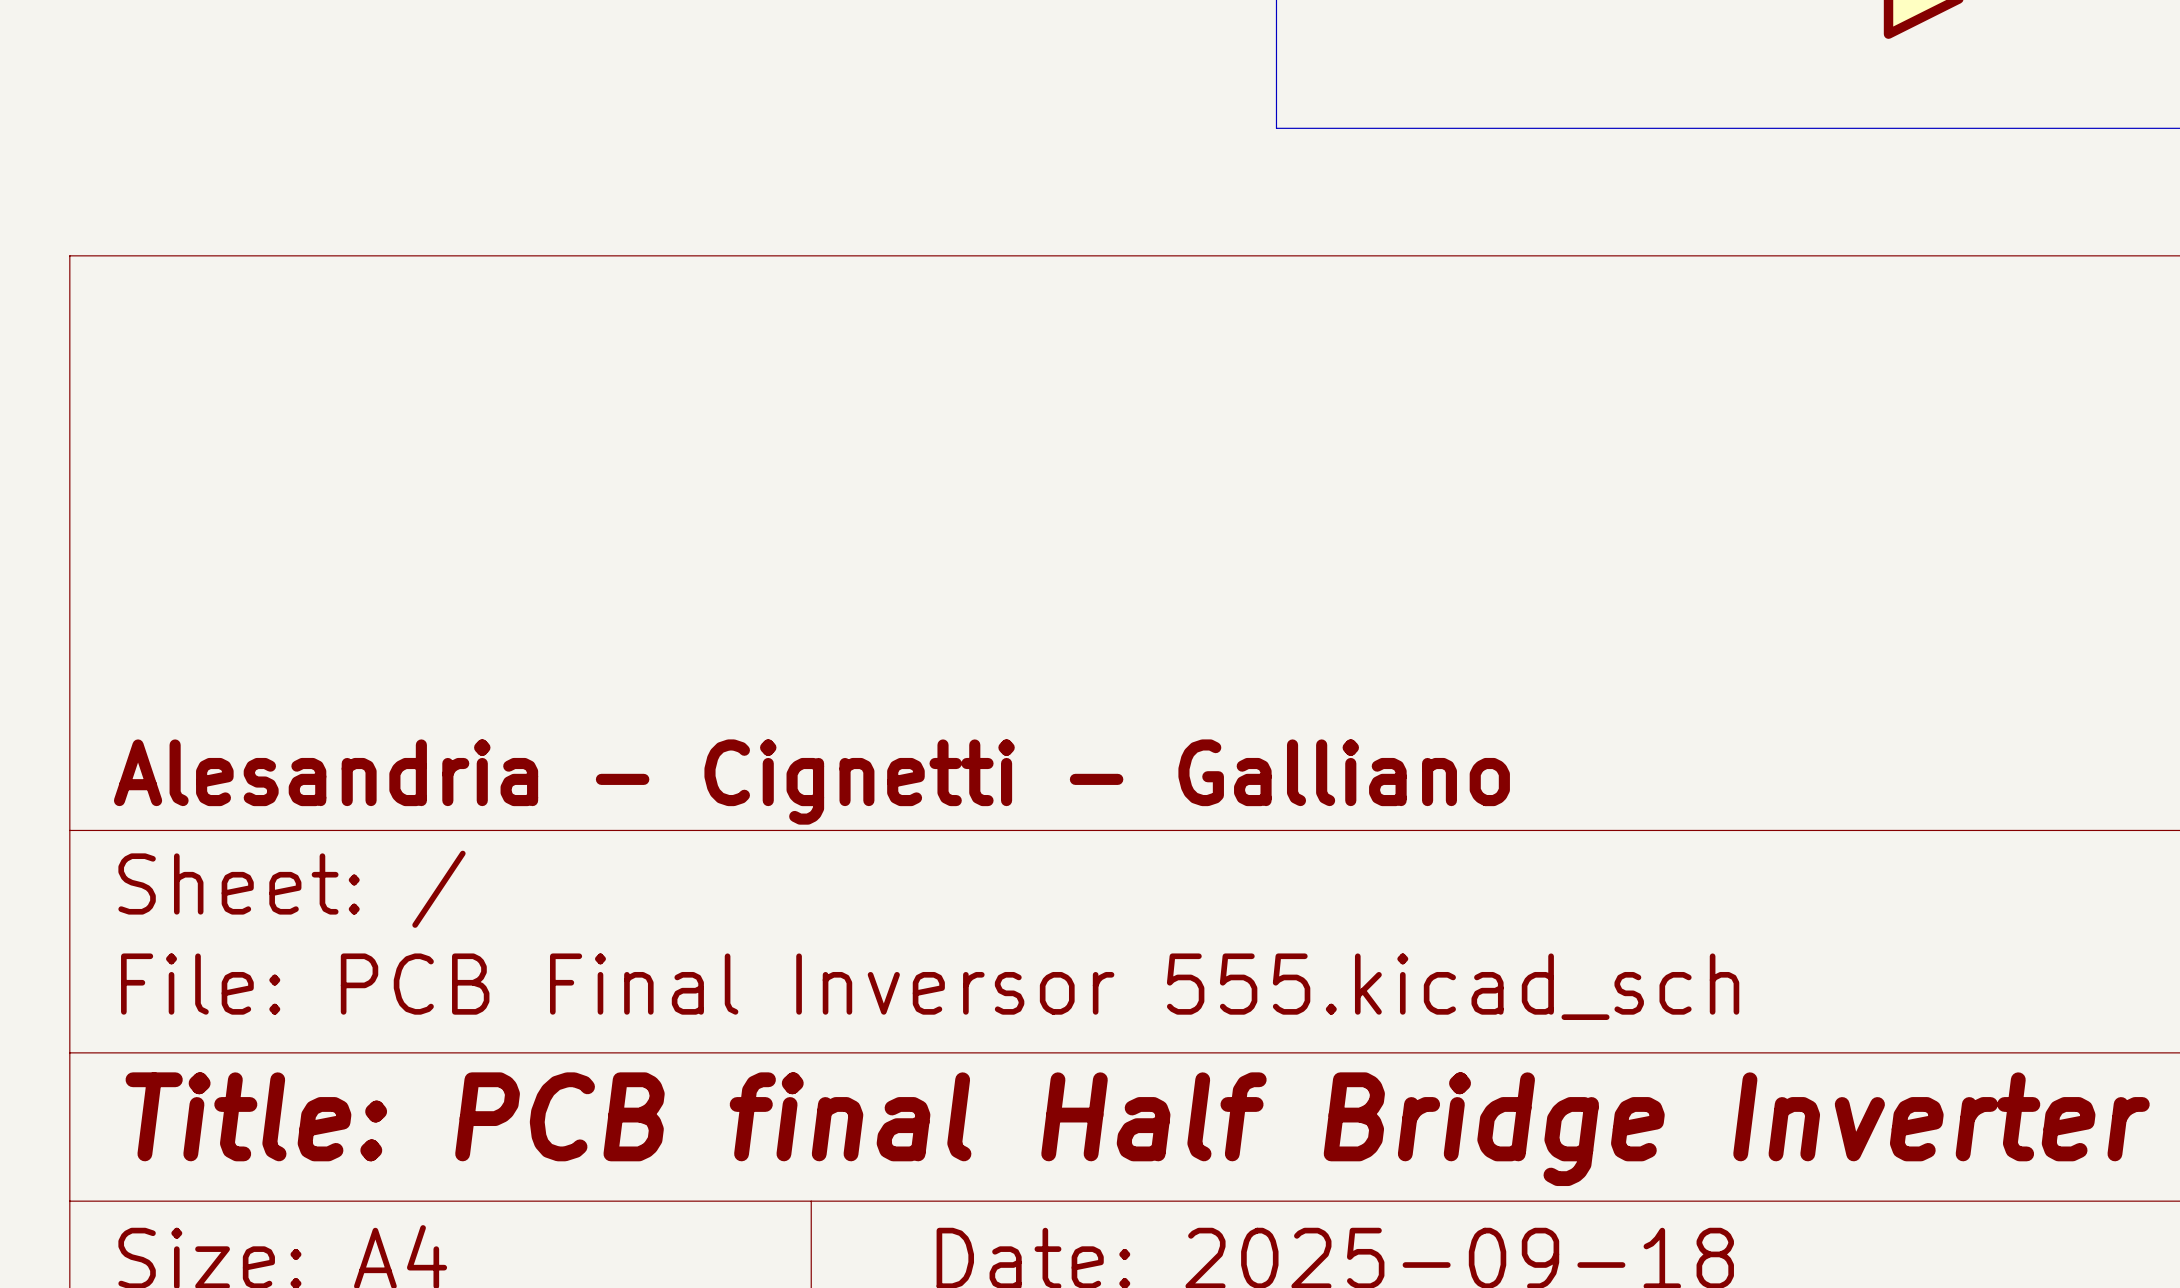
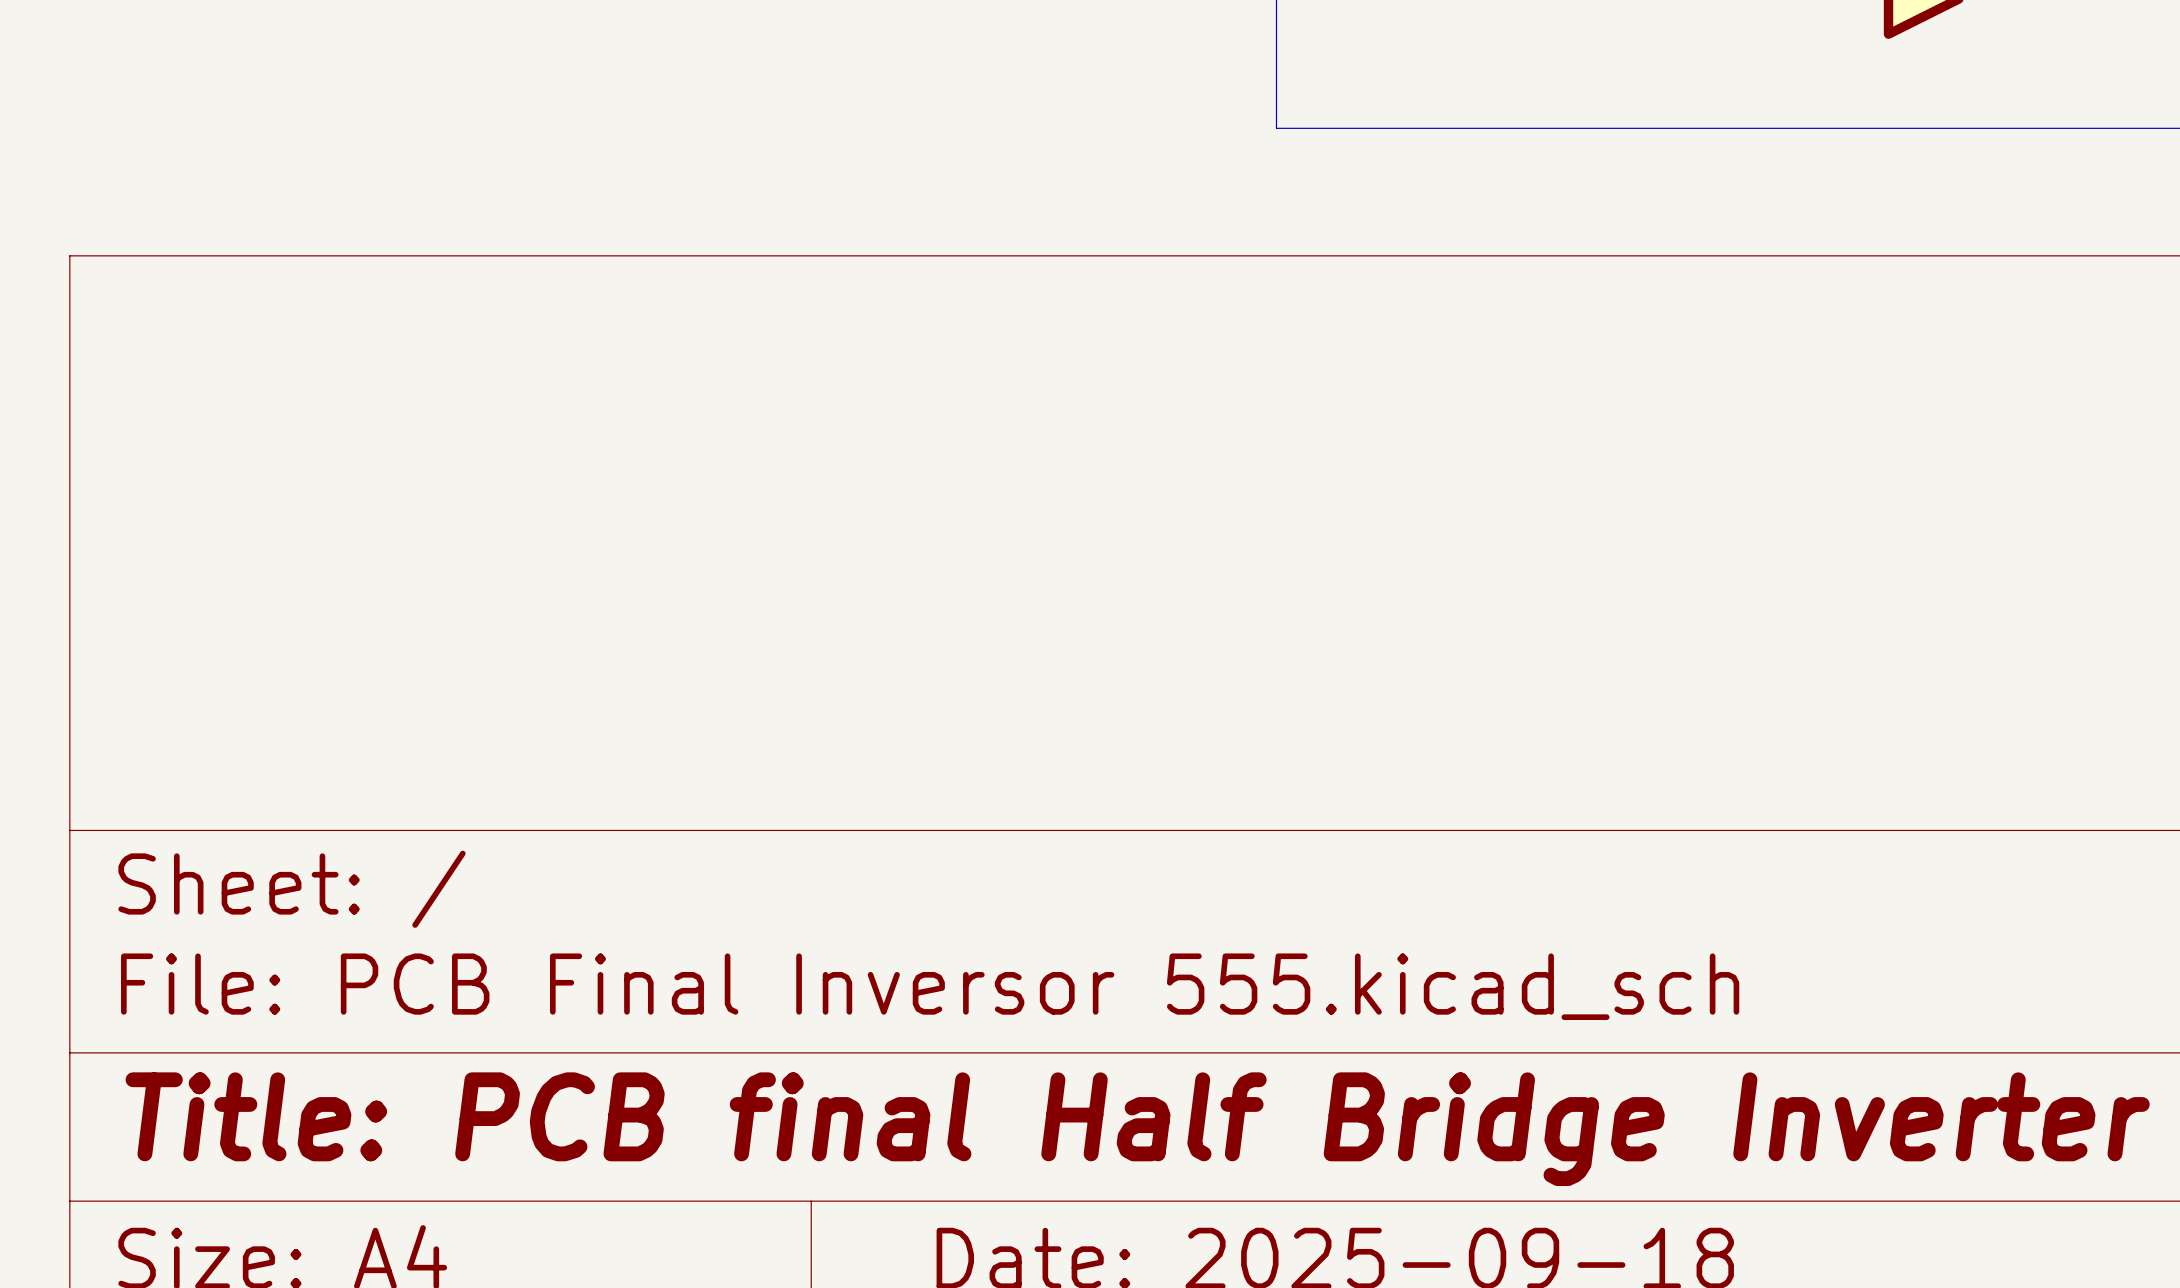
title block: Alesandria - Cignetti - Galliano (811, 782) -> none

